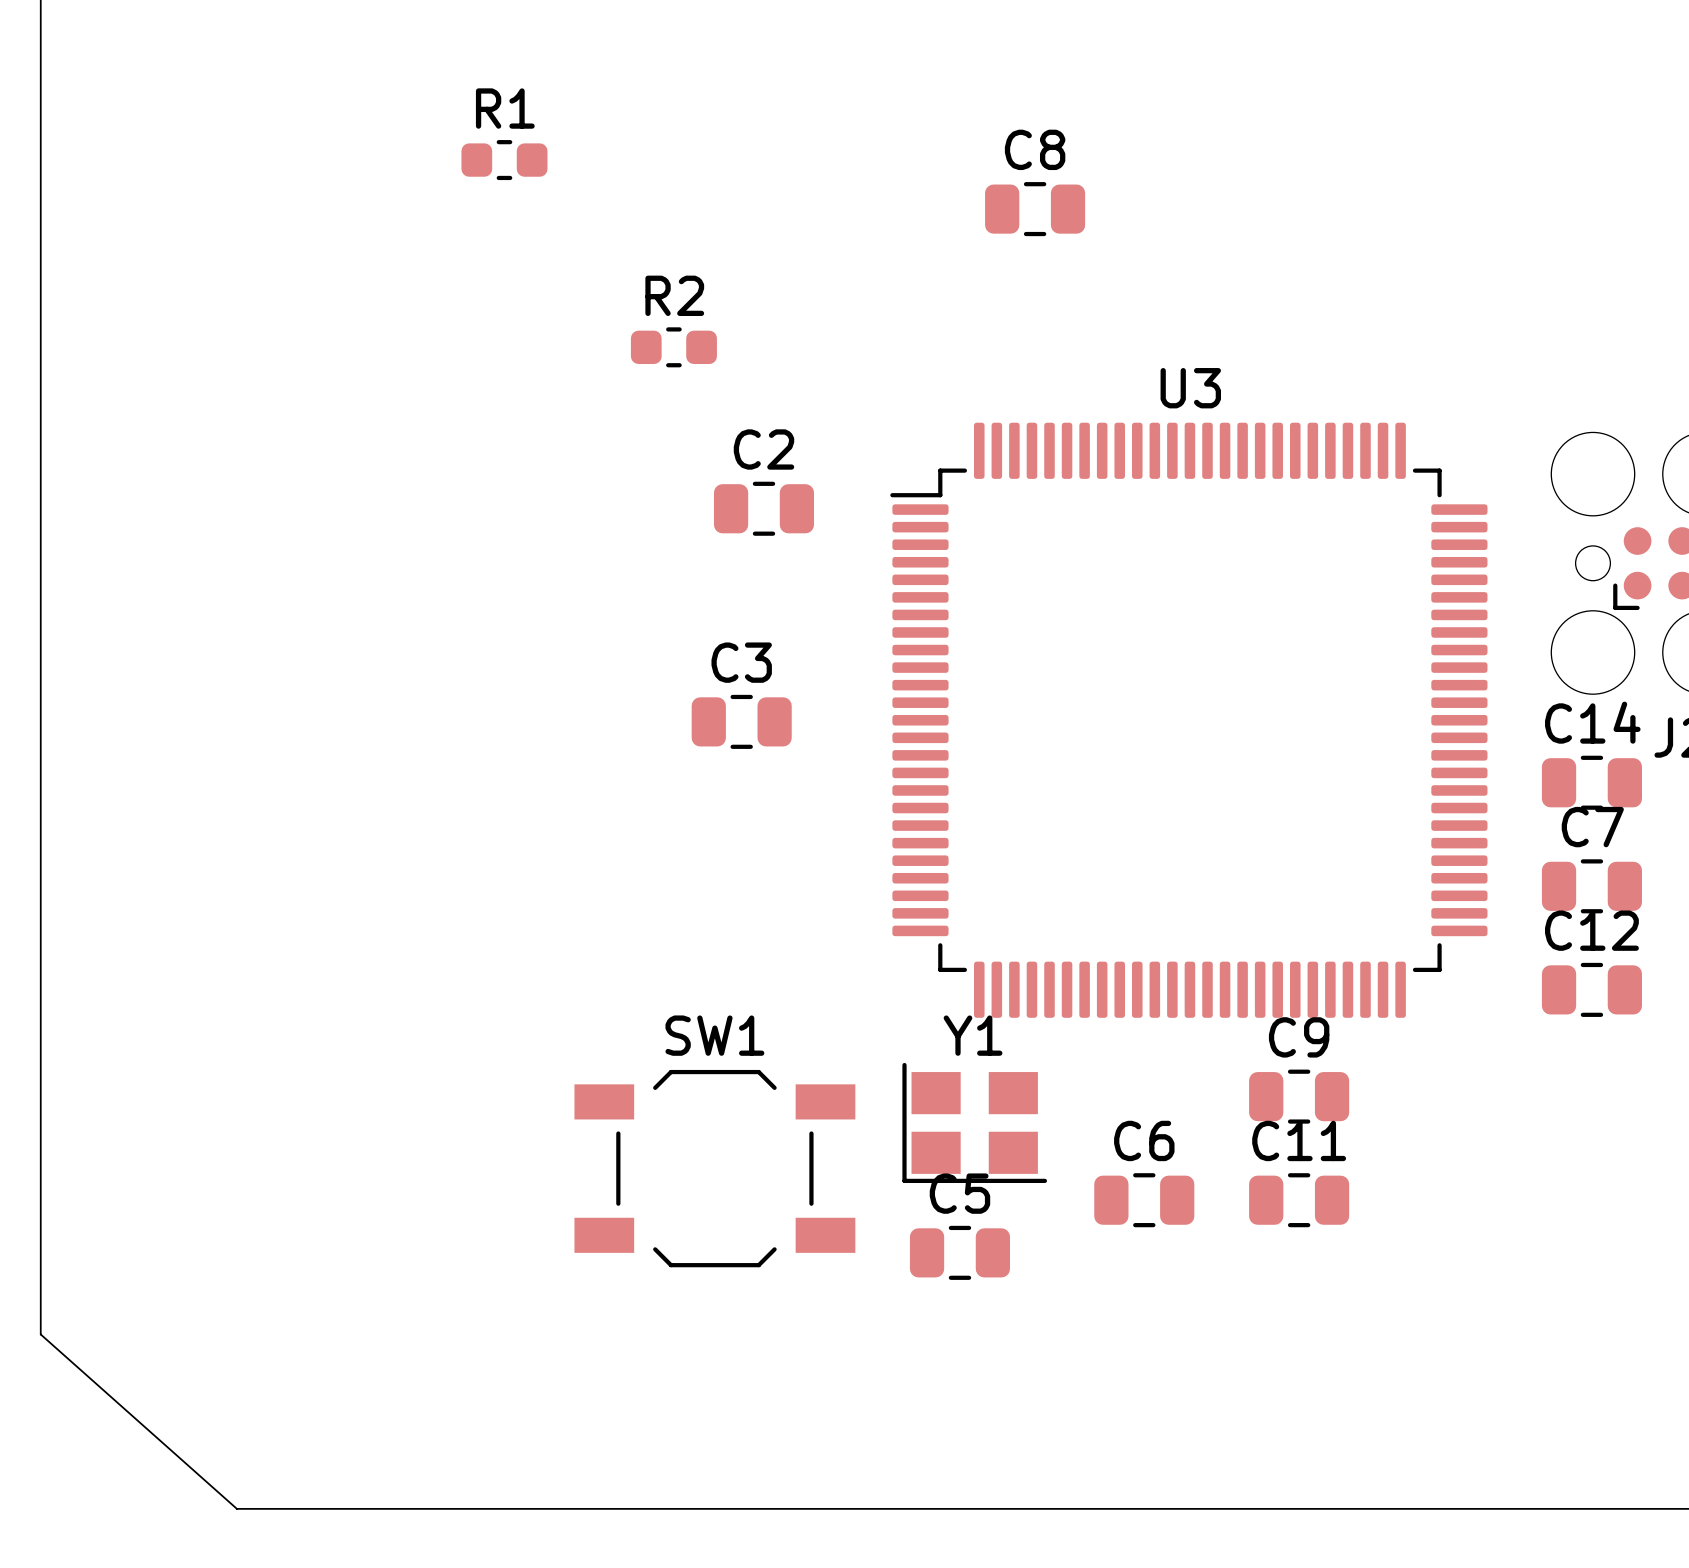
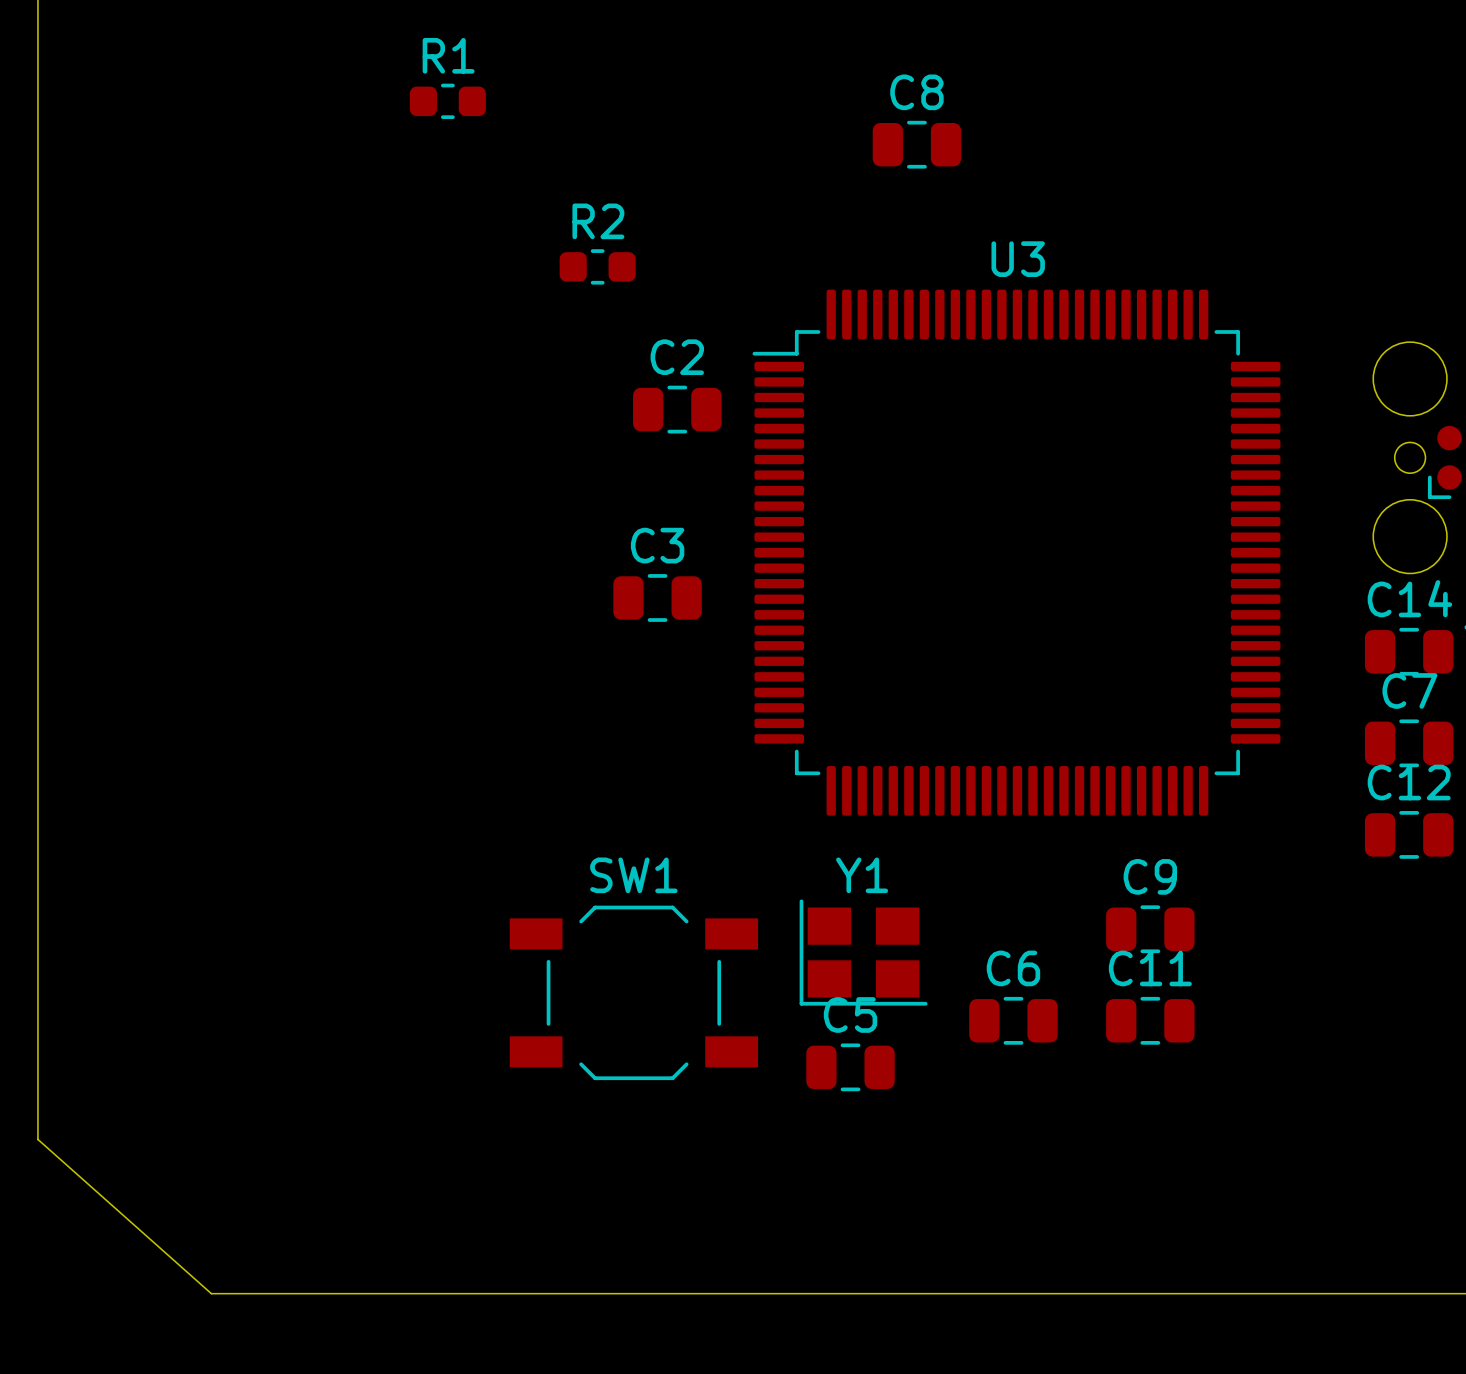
U3 position: (1188, 720) -> (1016, 552)

